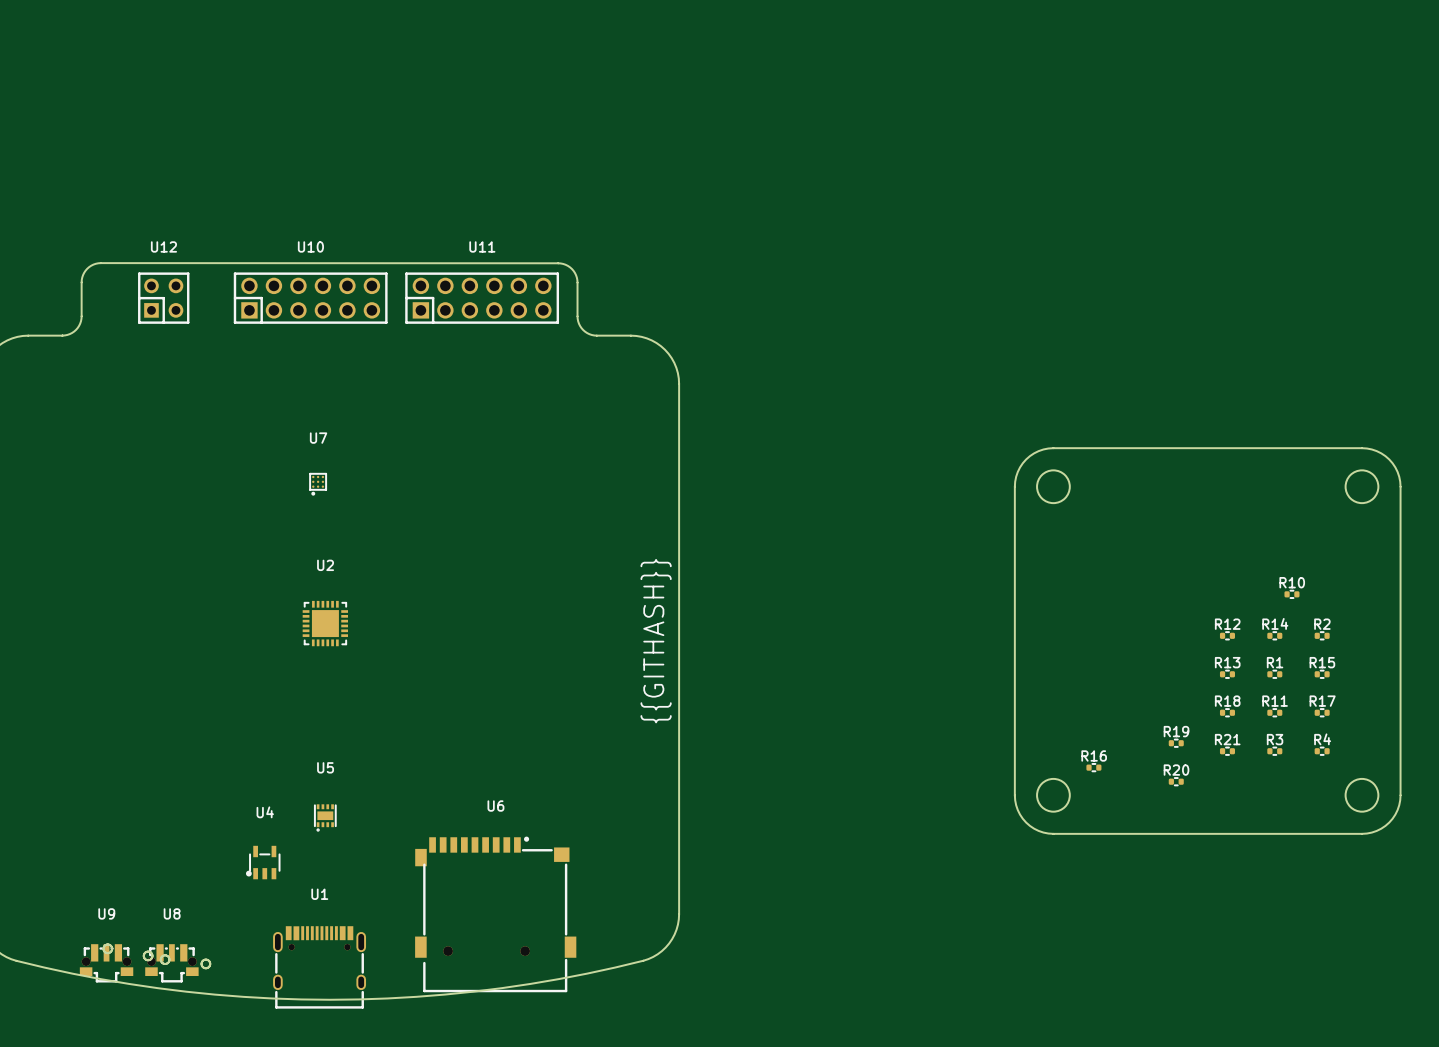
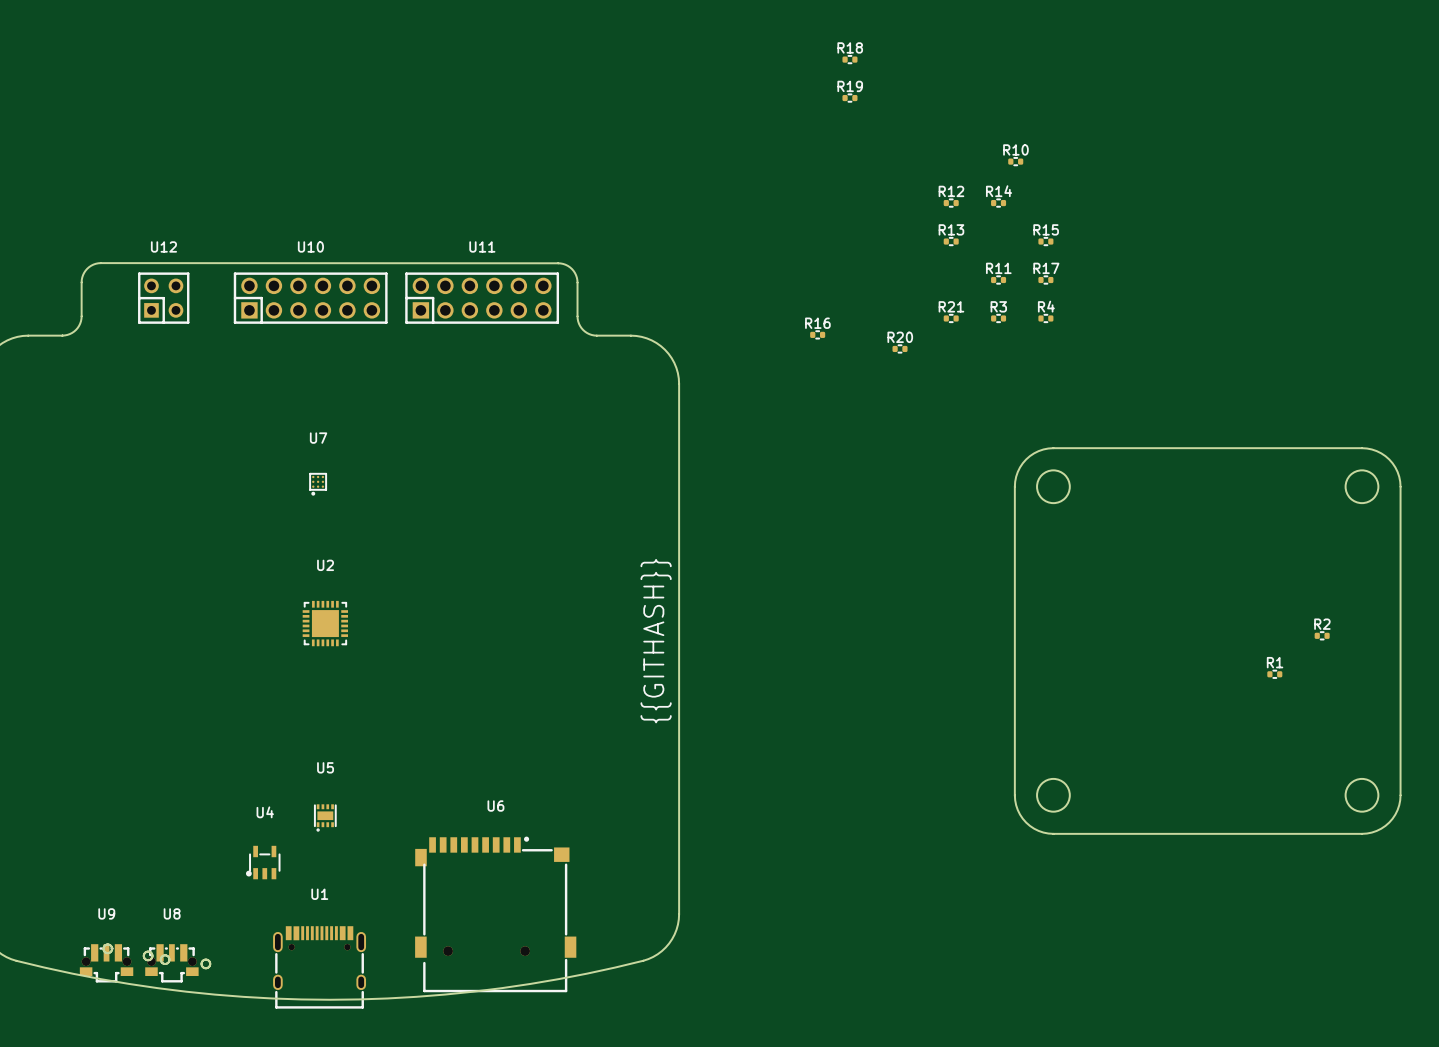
R10 position: (1291, 594) -> (1015, 161)
R12 position: (1227, 635) -> (951, 203)
R14 position: (1274, 635) -> (998, 203)
R13 position: (1227, 674) -> (951, 241)
R15 position: (1322, 674) -> (1045, 241)
R18 position: (1227, 712) -> (849, 59)
R11 position: (1274, 712) -> (998, 280)
R17 position: (1322, 712) -> (1045, 280)
R19 position: (1176, 743) -> (849, 98)
R21 position: (1227, 751) -> (951, 318)
R3 position: (1274, 751) -> (998, 318)
R4 position: (1322, 751) -> (1045, 318)
R16 position: (1093, 767) -> (817, 334)
R20 position: (1176, 781) -> (900, 348)

